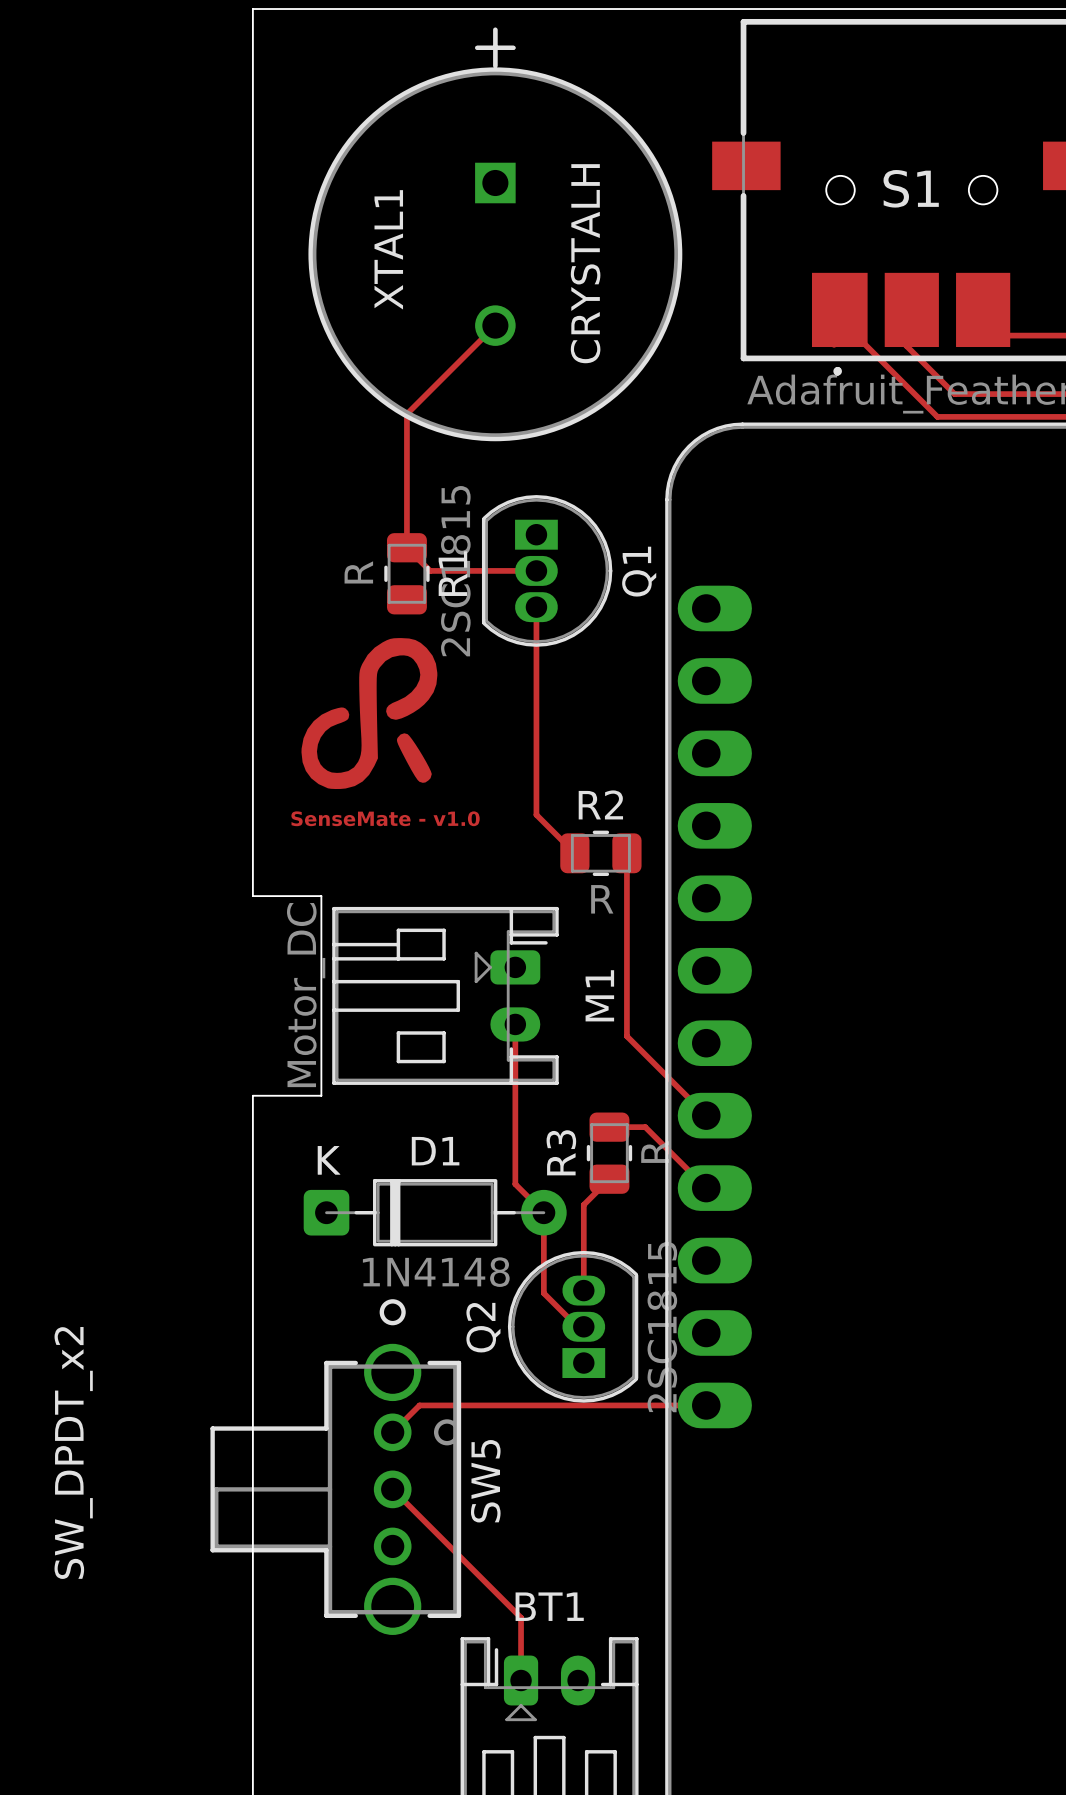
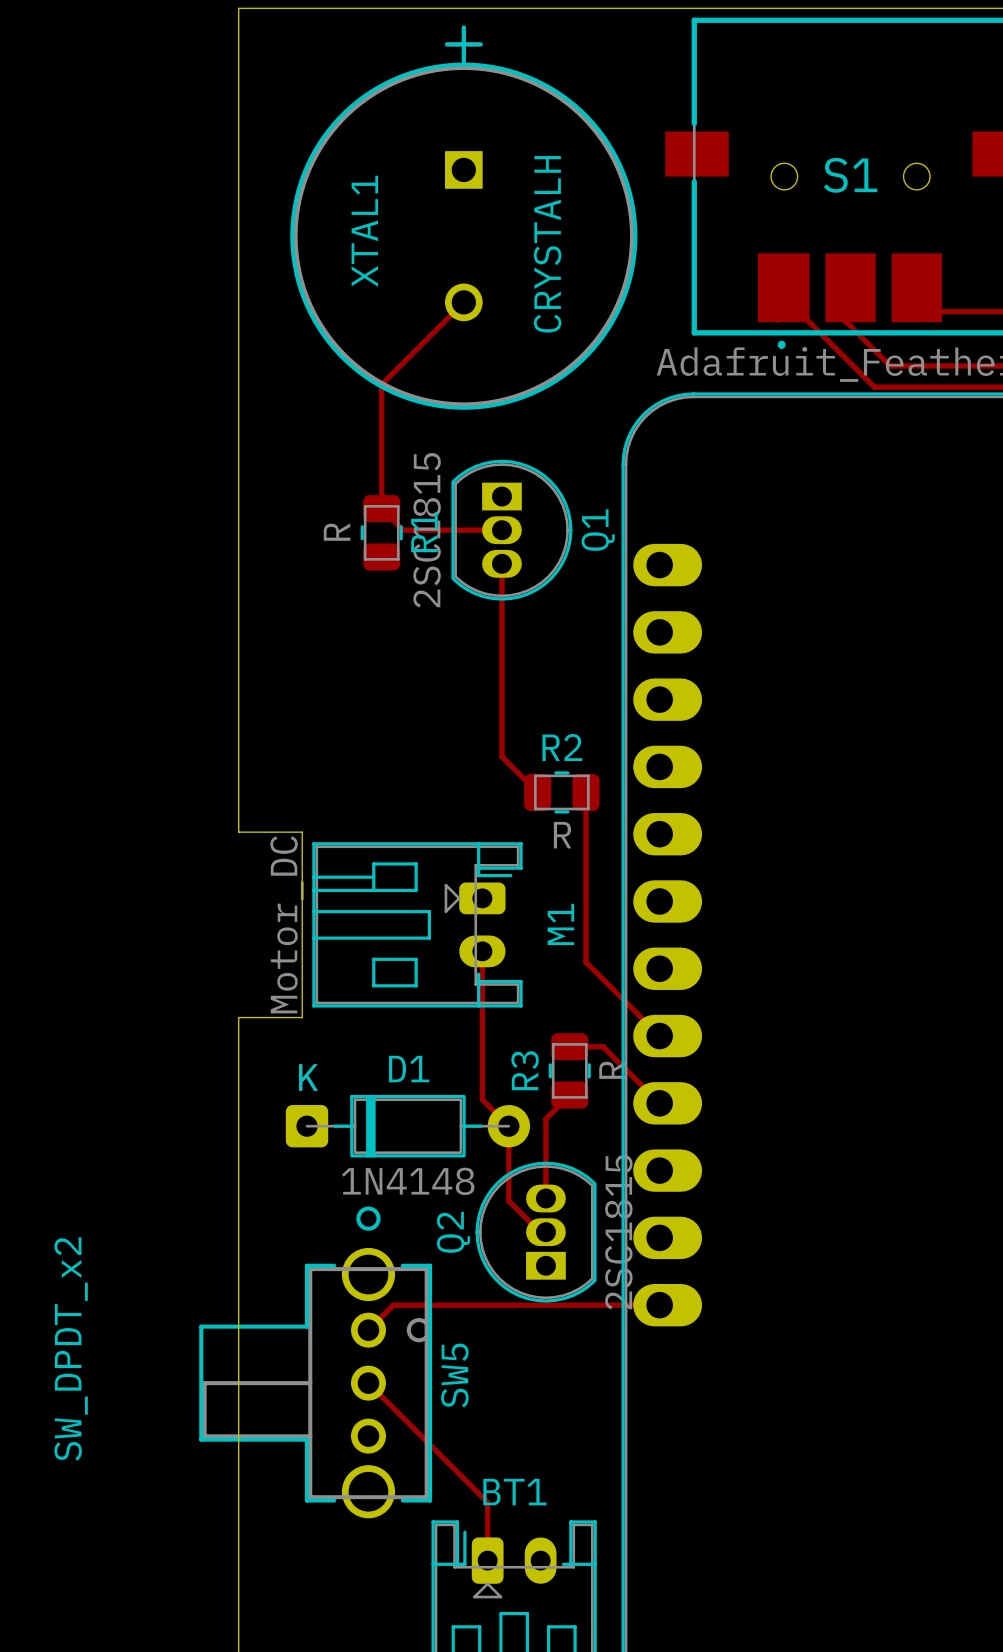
drawing: [301, 638, 438, 790] -> none
text: SenseMate - v1.0 (385, 818) -> none

